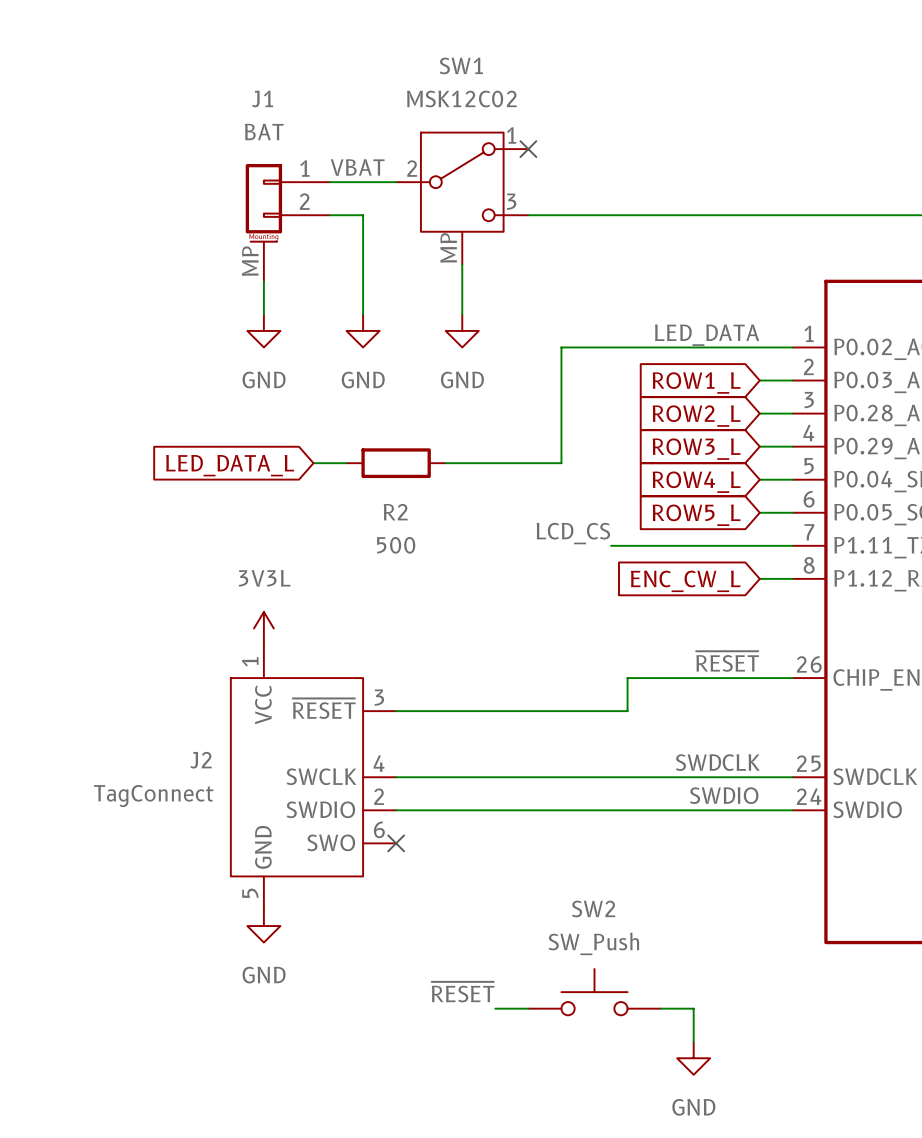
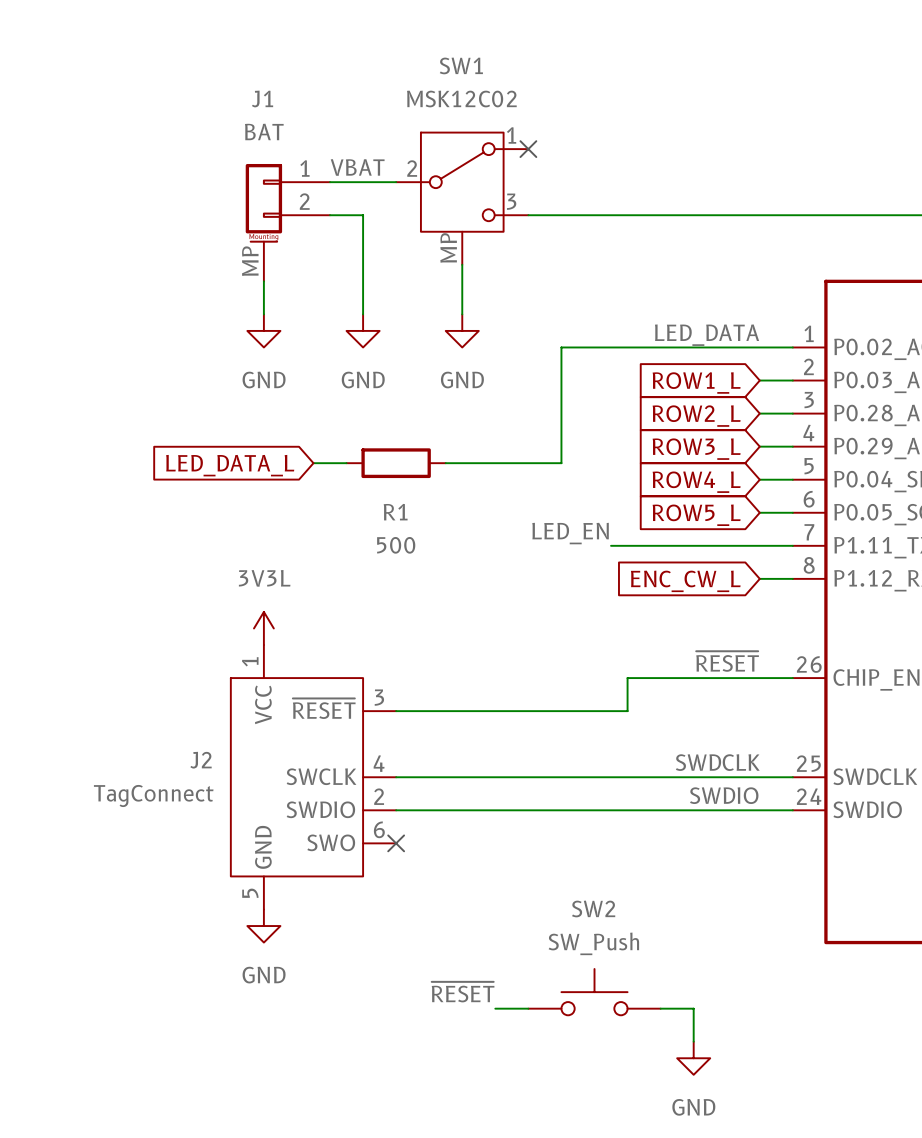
R2 name: R2 (395, 512) -> R1 (395, 512)
label: LCD_CS (573, 533) -> LED_EN (570, 533)

